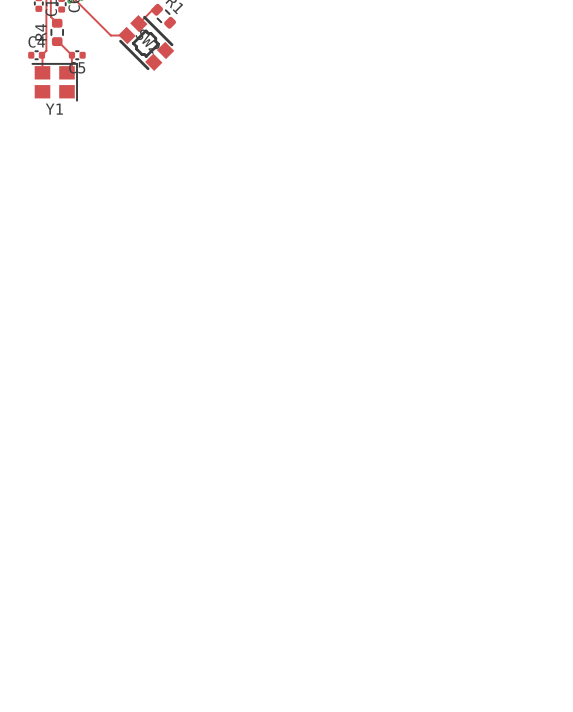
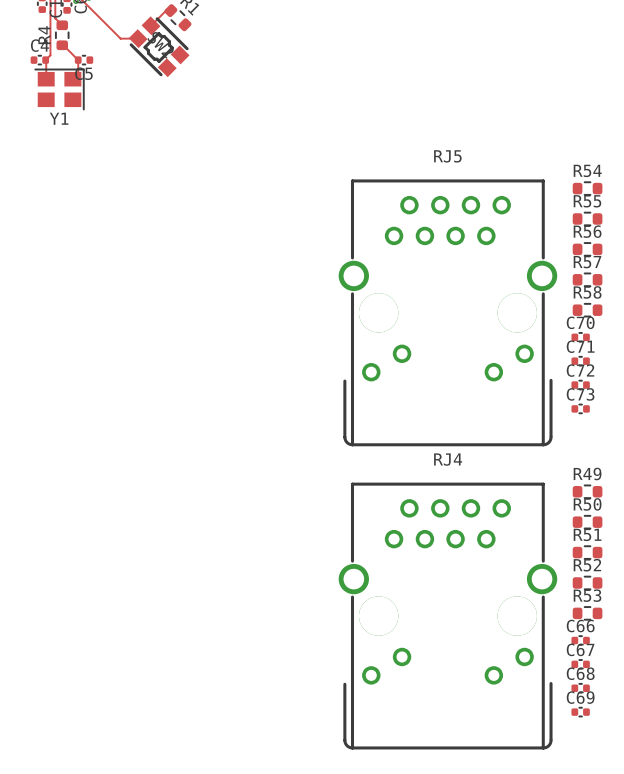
R54: none -> (587, 188)
R55: none -> (587, 218)
R56: none -> (587, 249)
R57: none -> (587, 279)
R58: none -> (587, 310)
RJ5: none -> (447, 312)
C70: none -> (580, 337)
C71: none -> (580, 361)
C72: none -> (580, 385)
C73: none -> (580, 408)
R49: none -> (587, 491)
R50: none -> (587, 522)
R51: none -> (587, 552)
R52: none -> (587, 582)
R53: none -> (587, 613)
RJ4: none -> (447, 616)
C66: none -> (580, 640)
C67: none -> (580, 664)
C68: none -> (580, 688)
C69: none -> (580, 712)

